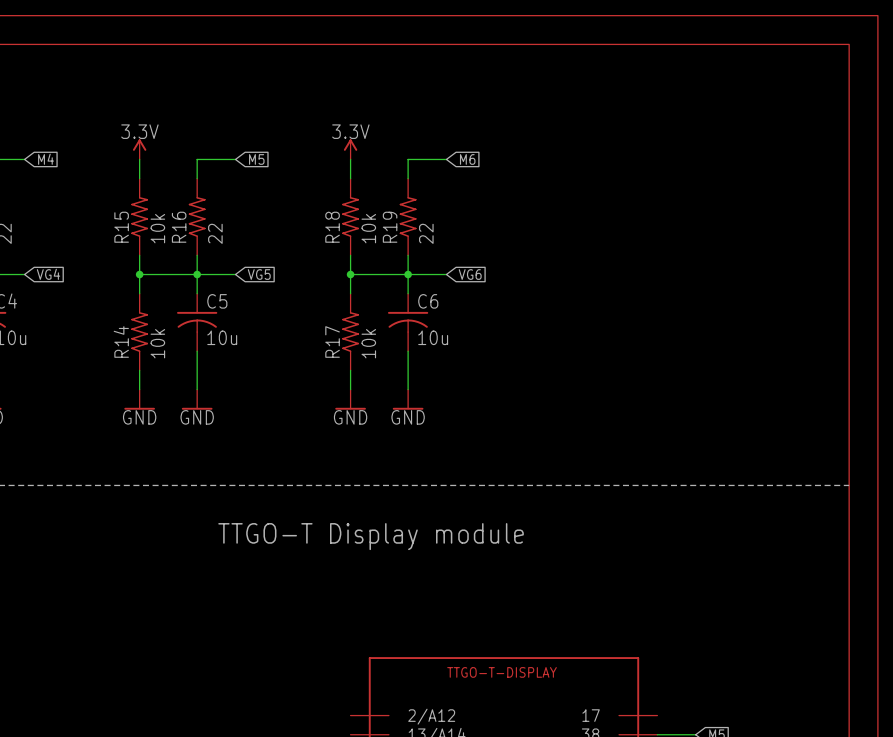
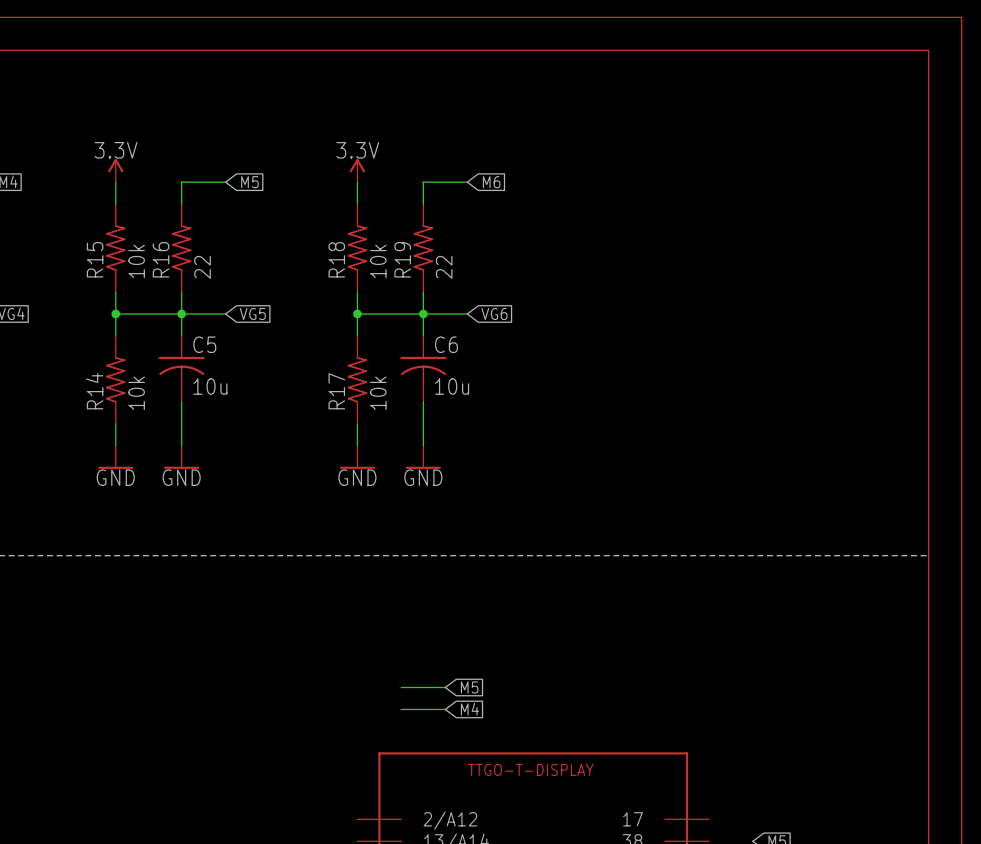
text: TTGO-T Display module (371, 536) -> none
wire: none -> (401, 687) (445, 687)
global label: none -> M5 (469, 687)
wire: none -> (401, 709) (445, 709)
global label: none -> M4 (469, 709)
wire: (657, 734) (695, 734) -> none

